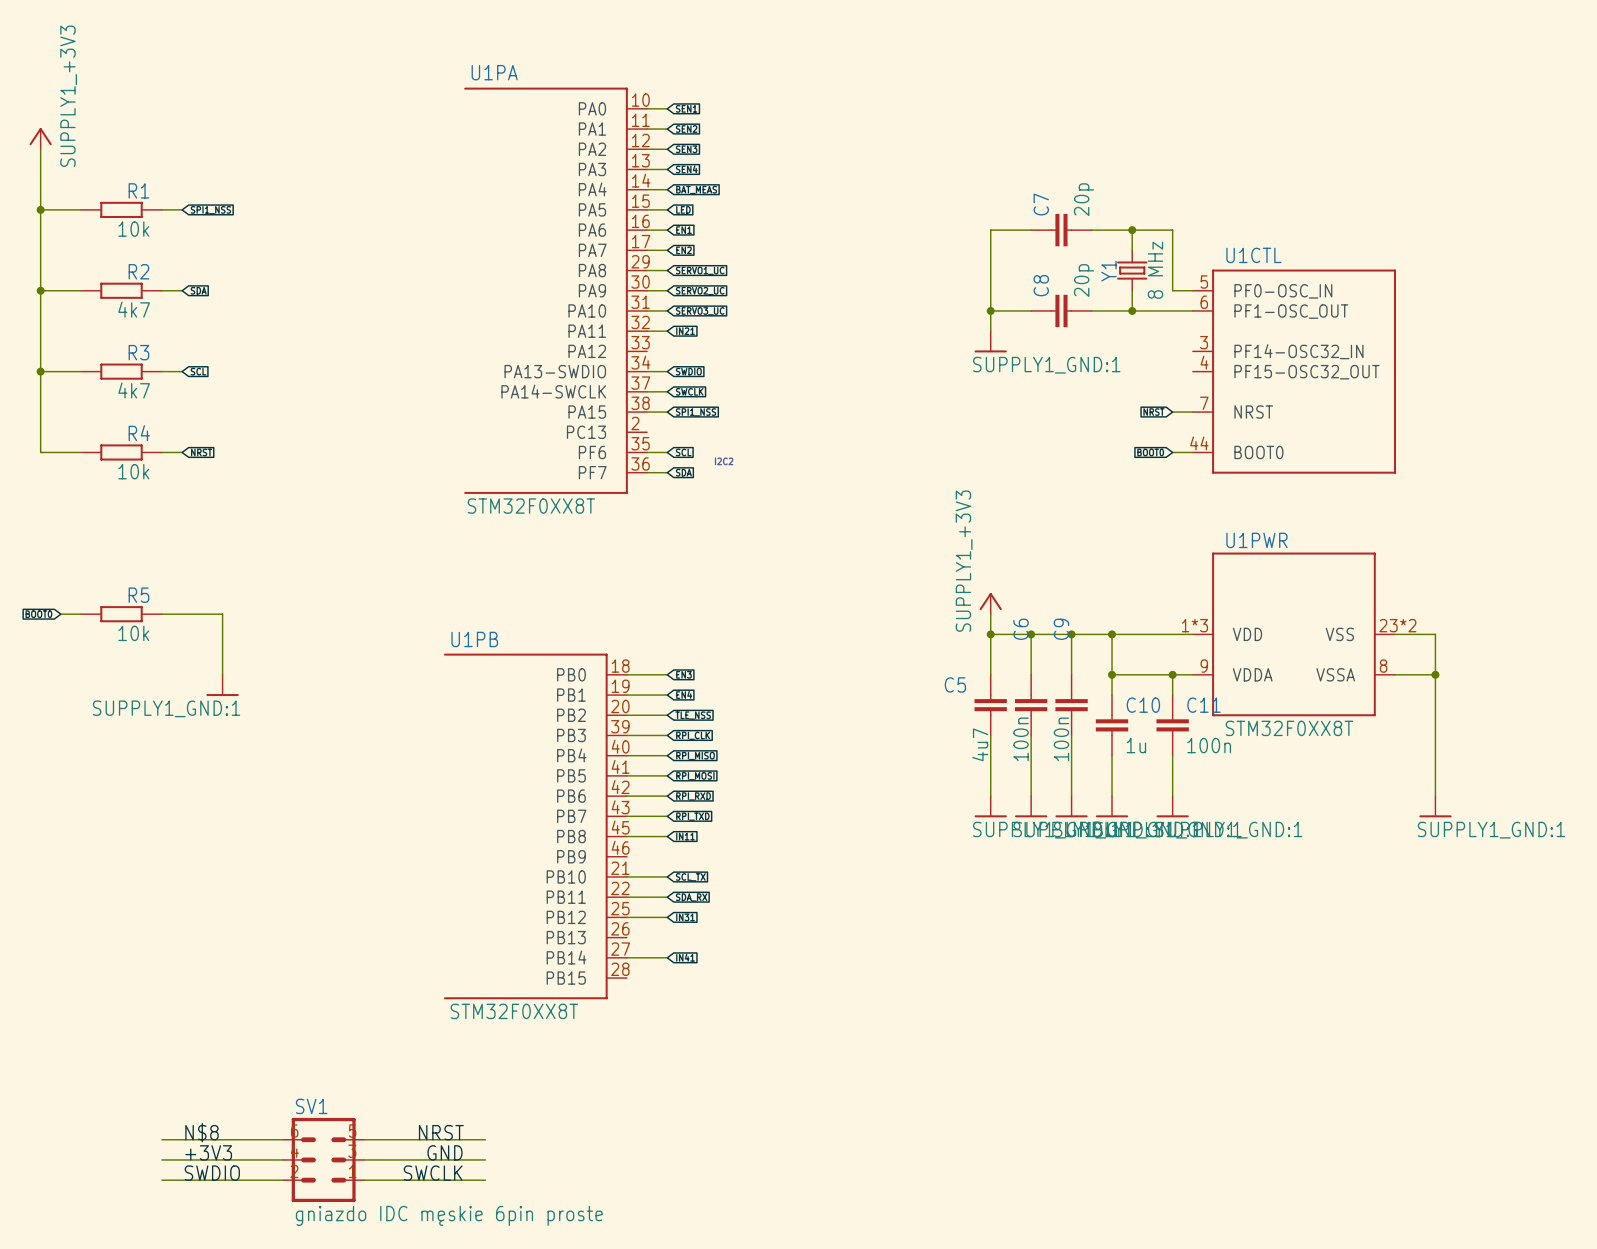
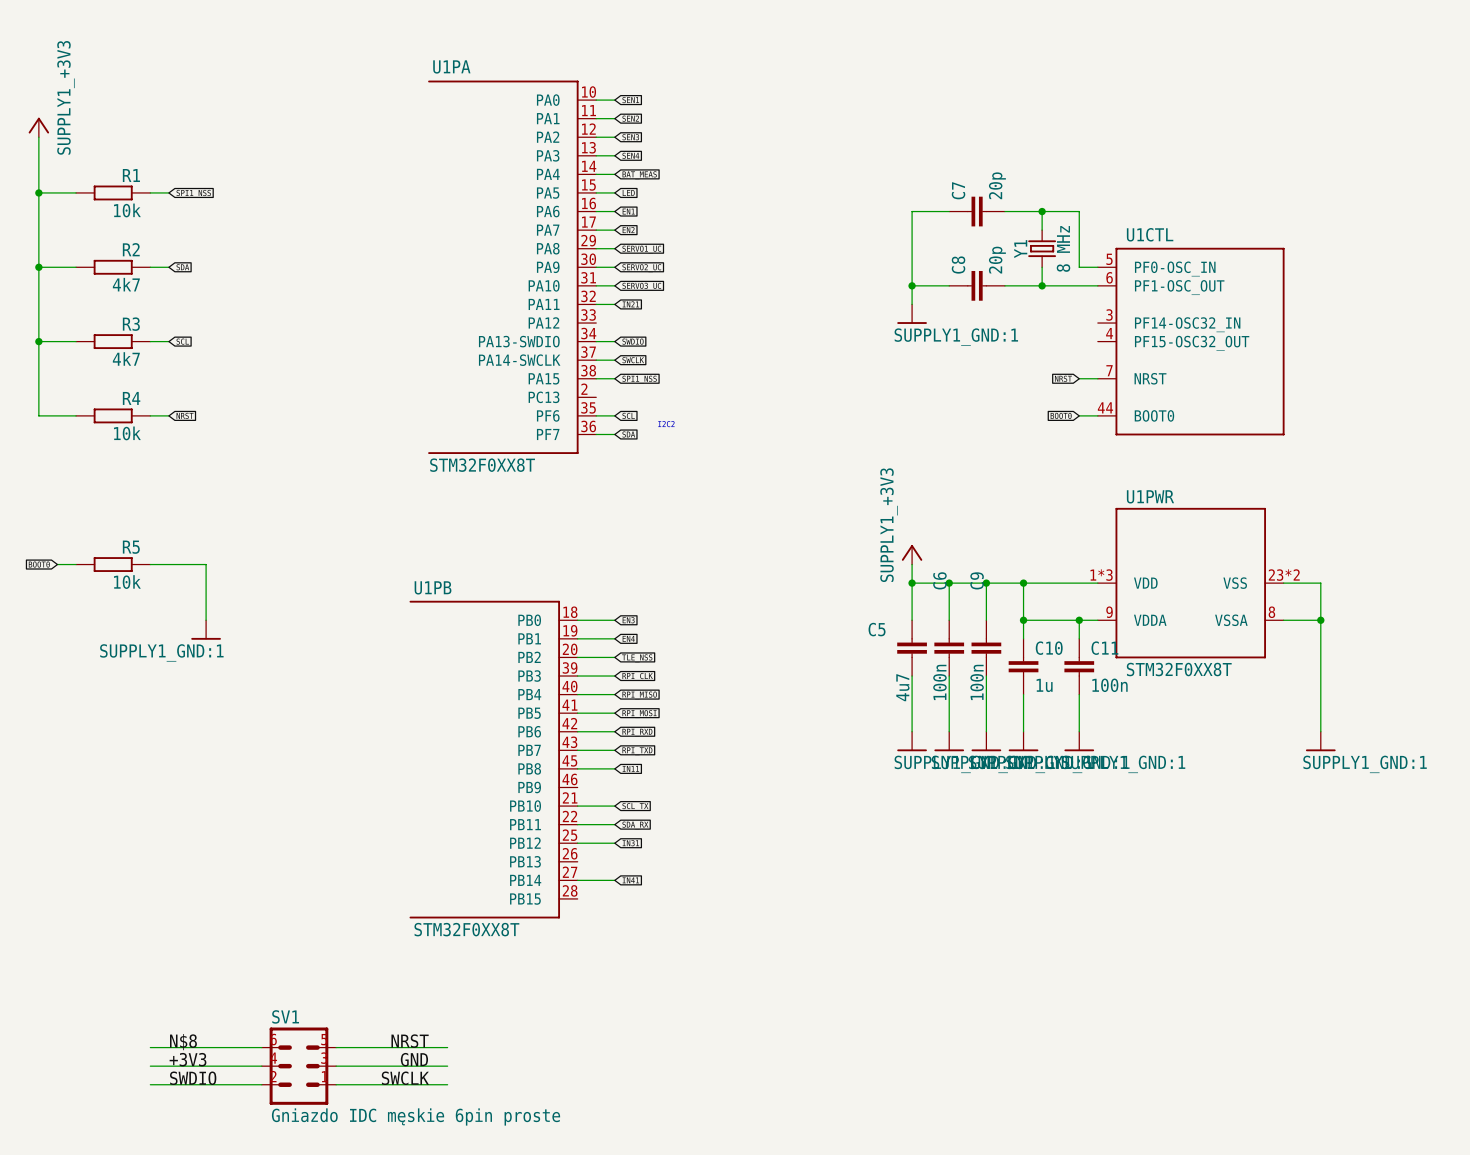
SV1 value: gniazdo IDC męskie 6pin proste (449, 1215) -> Gniazdo IDC męskie 6pin proste (416, 1116)

